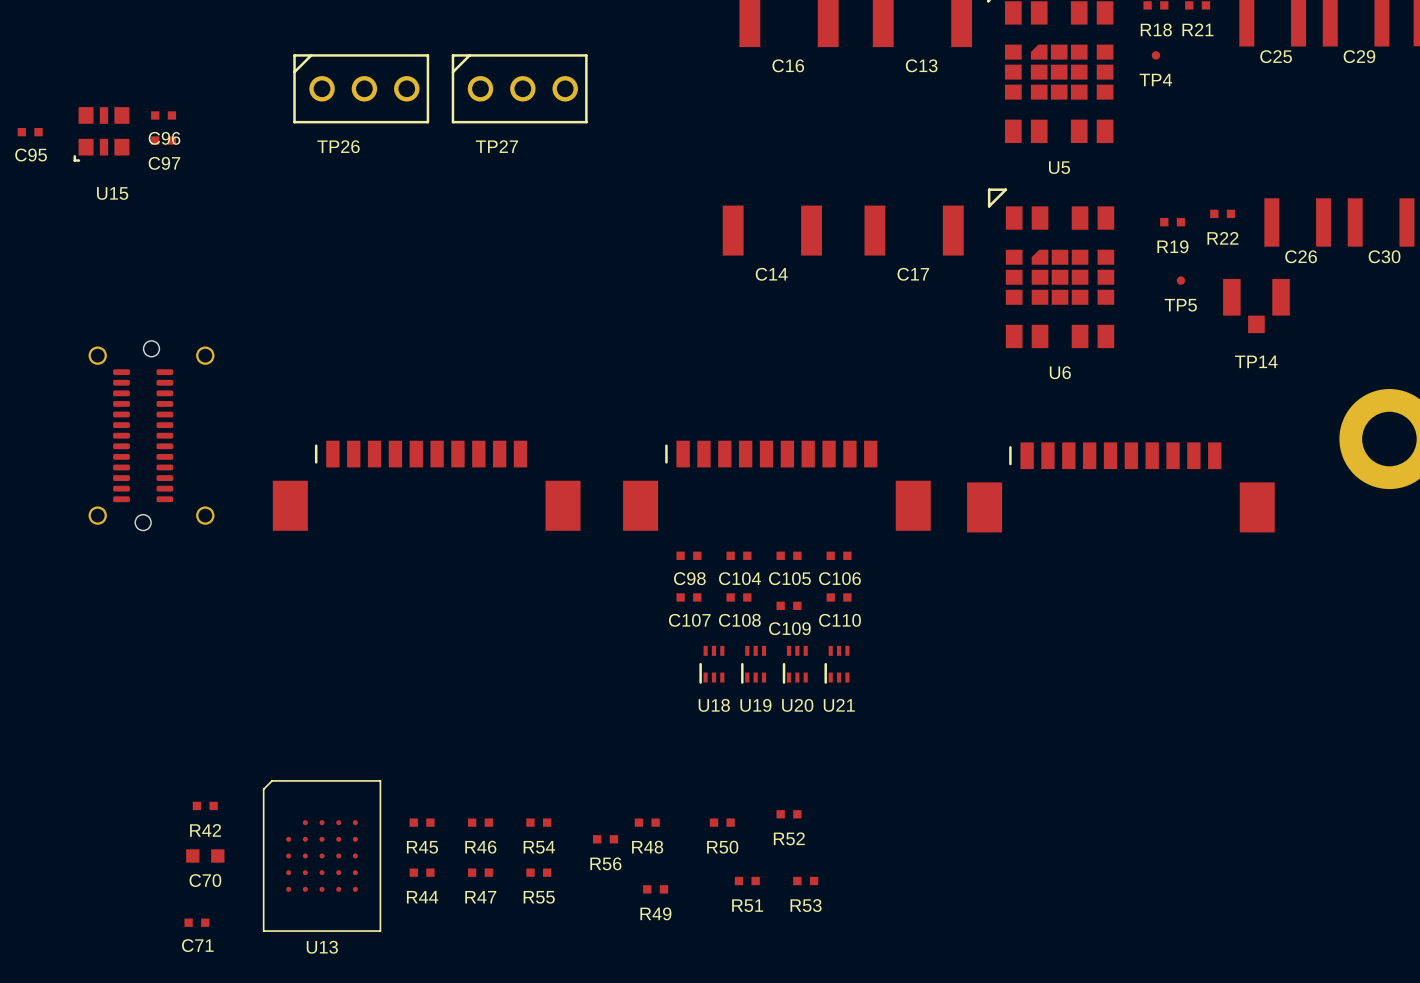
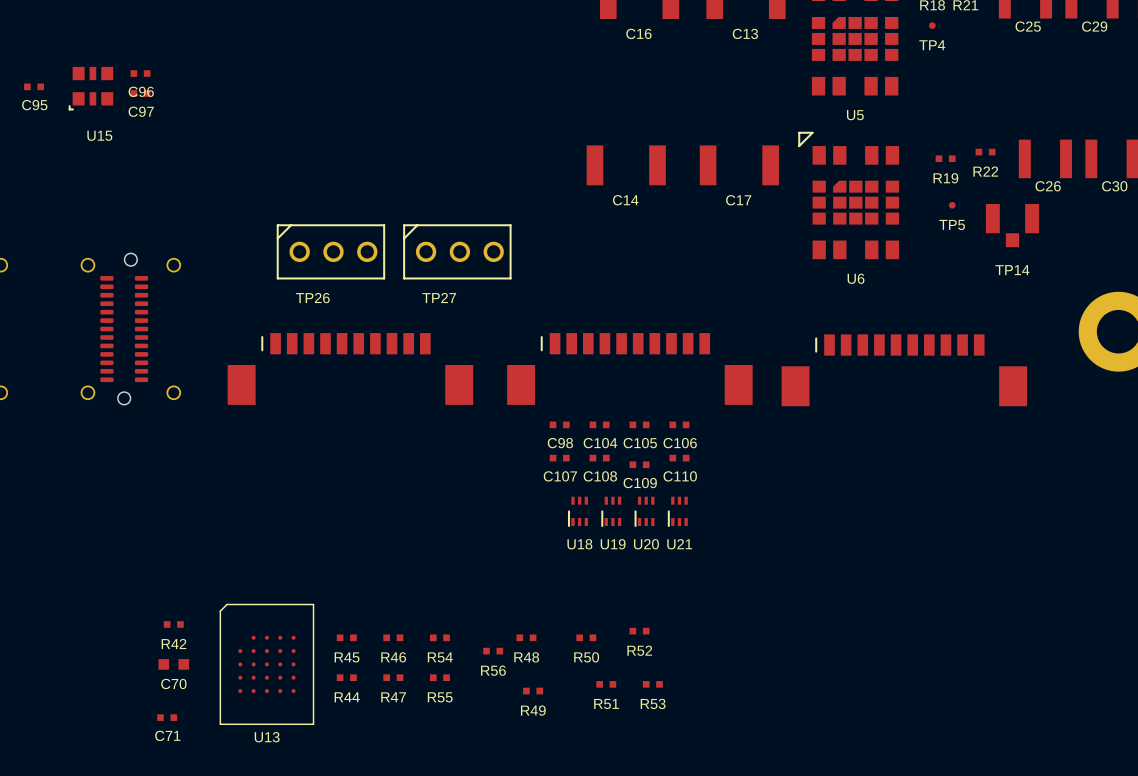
TP26 position: (361, 88) -> (330, 251)
TP27 position: (519, 88) -> (457, 251)

